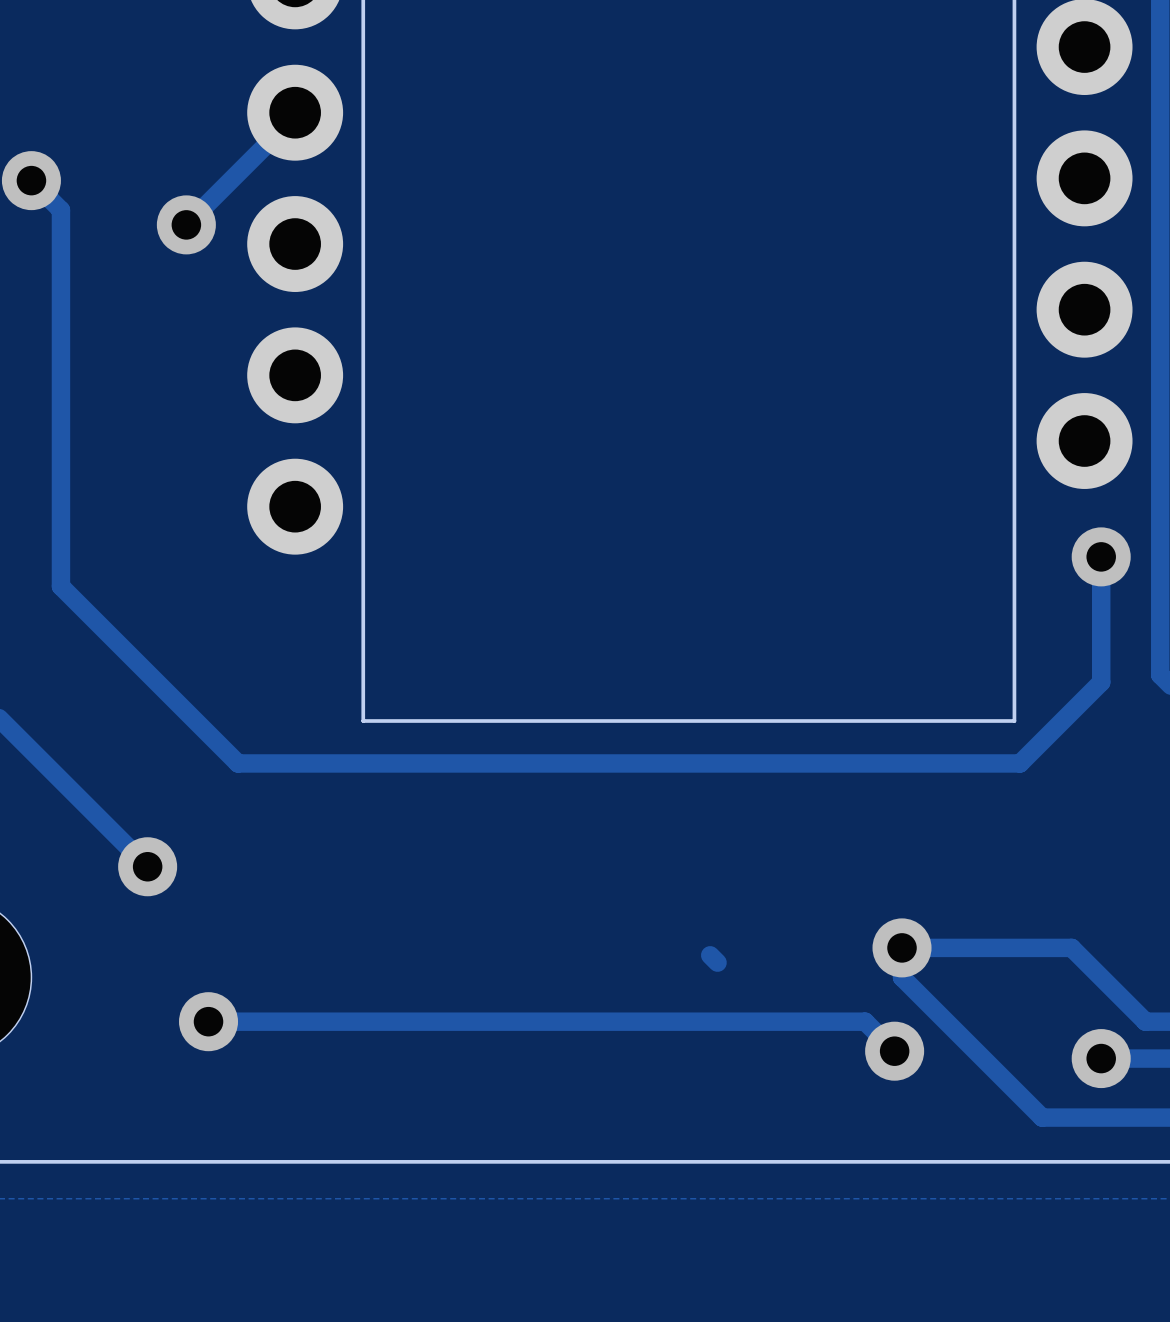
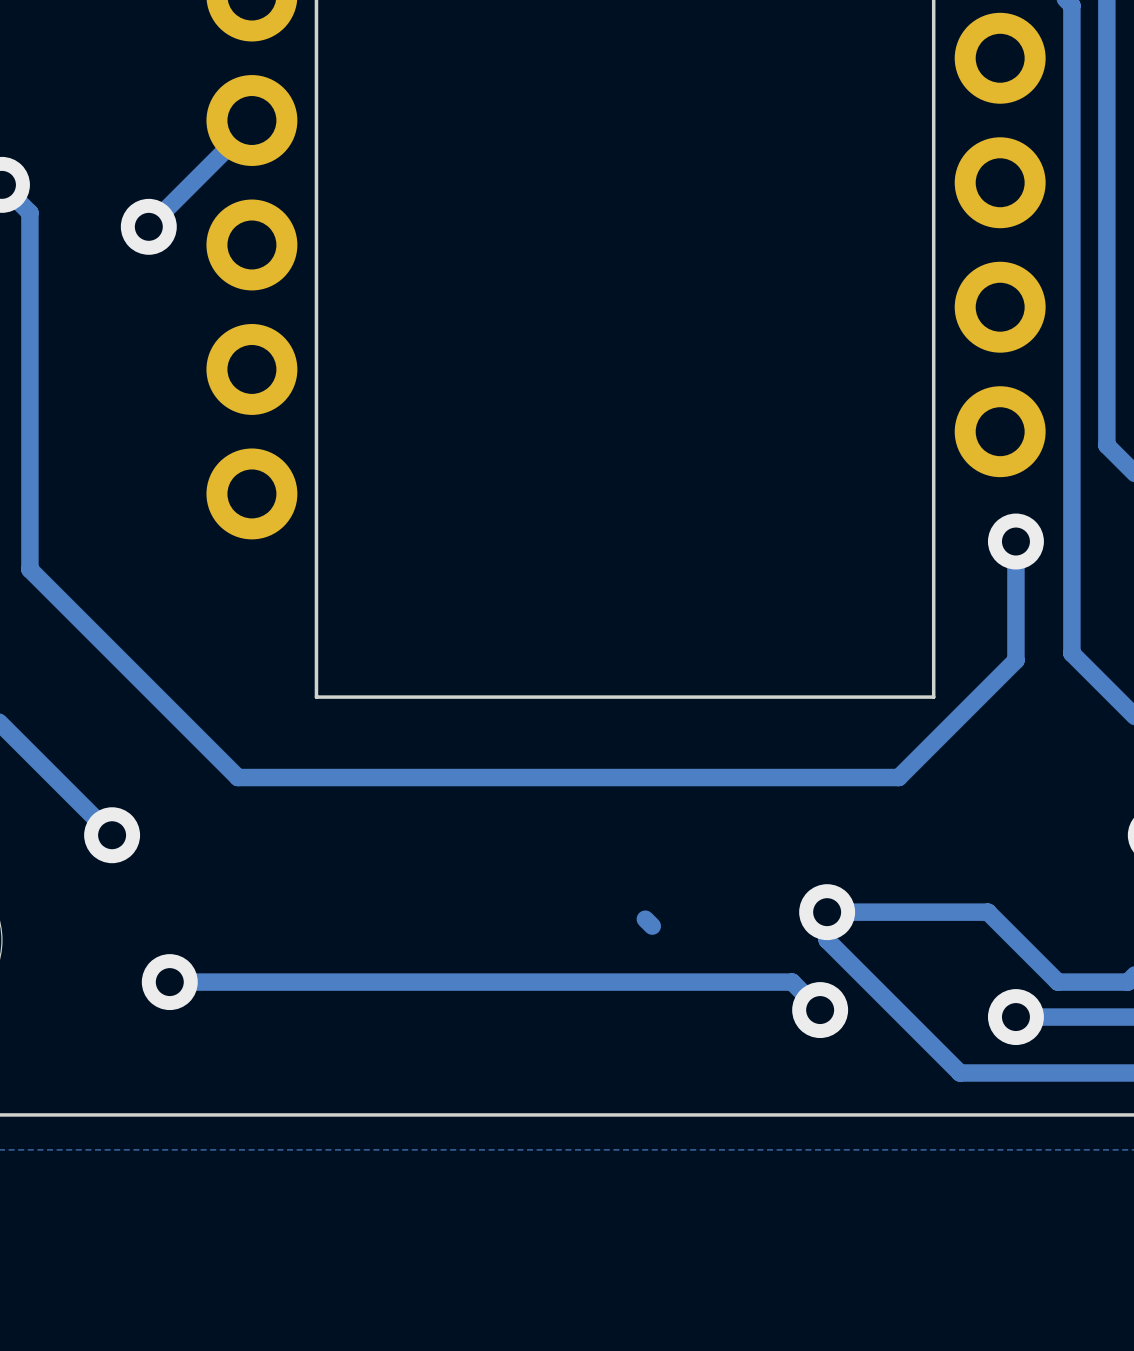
track: (1020, 763) (238, 763) -> (939, 737) (898, 777) (237, 777) (197, 737)

